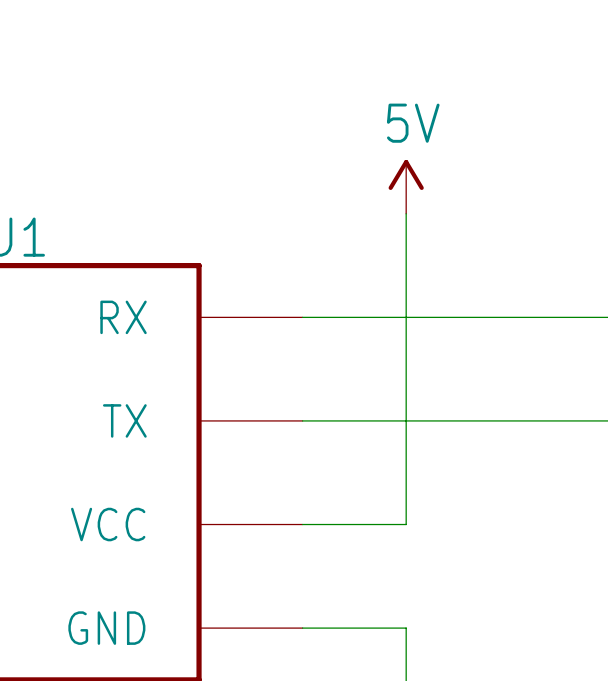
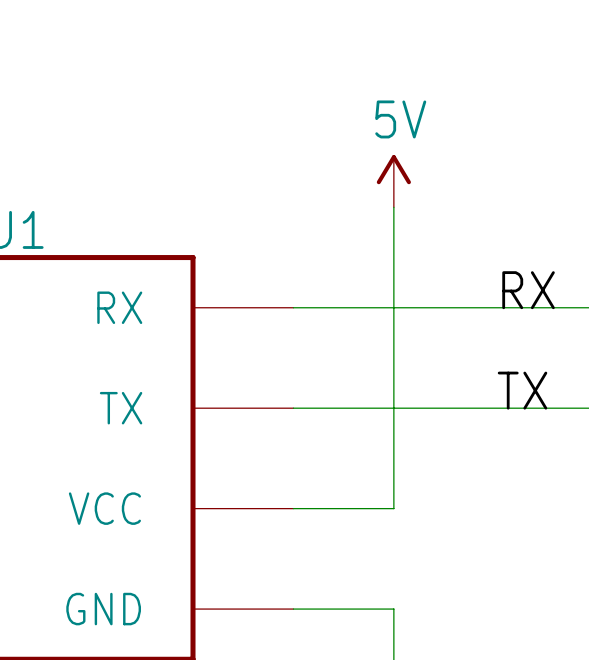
label: none -> RX (528, 290)
label: none -> TX (522, 390)

